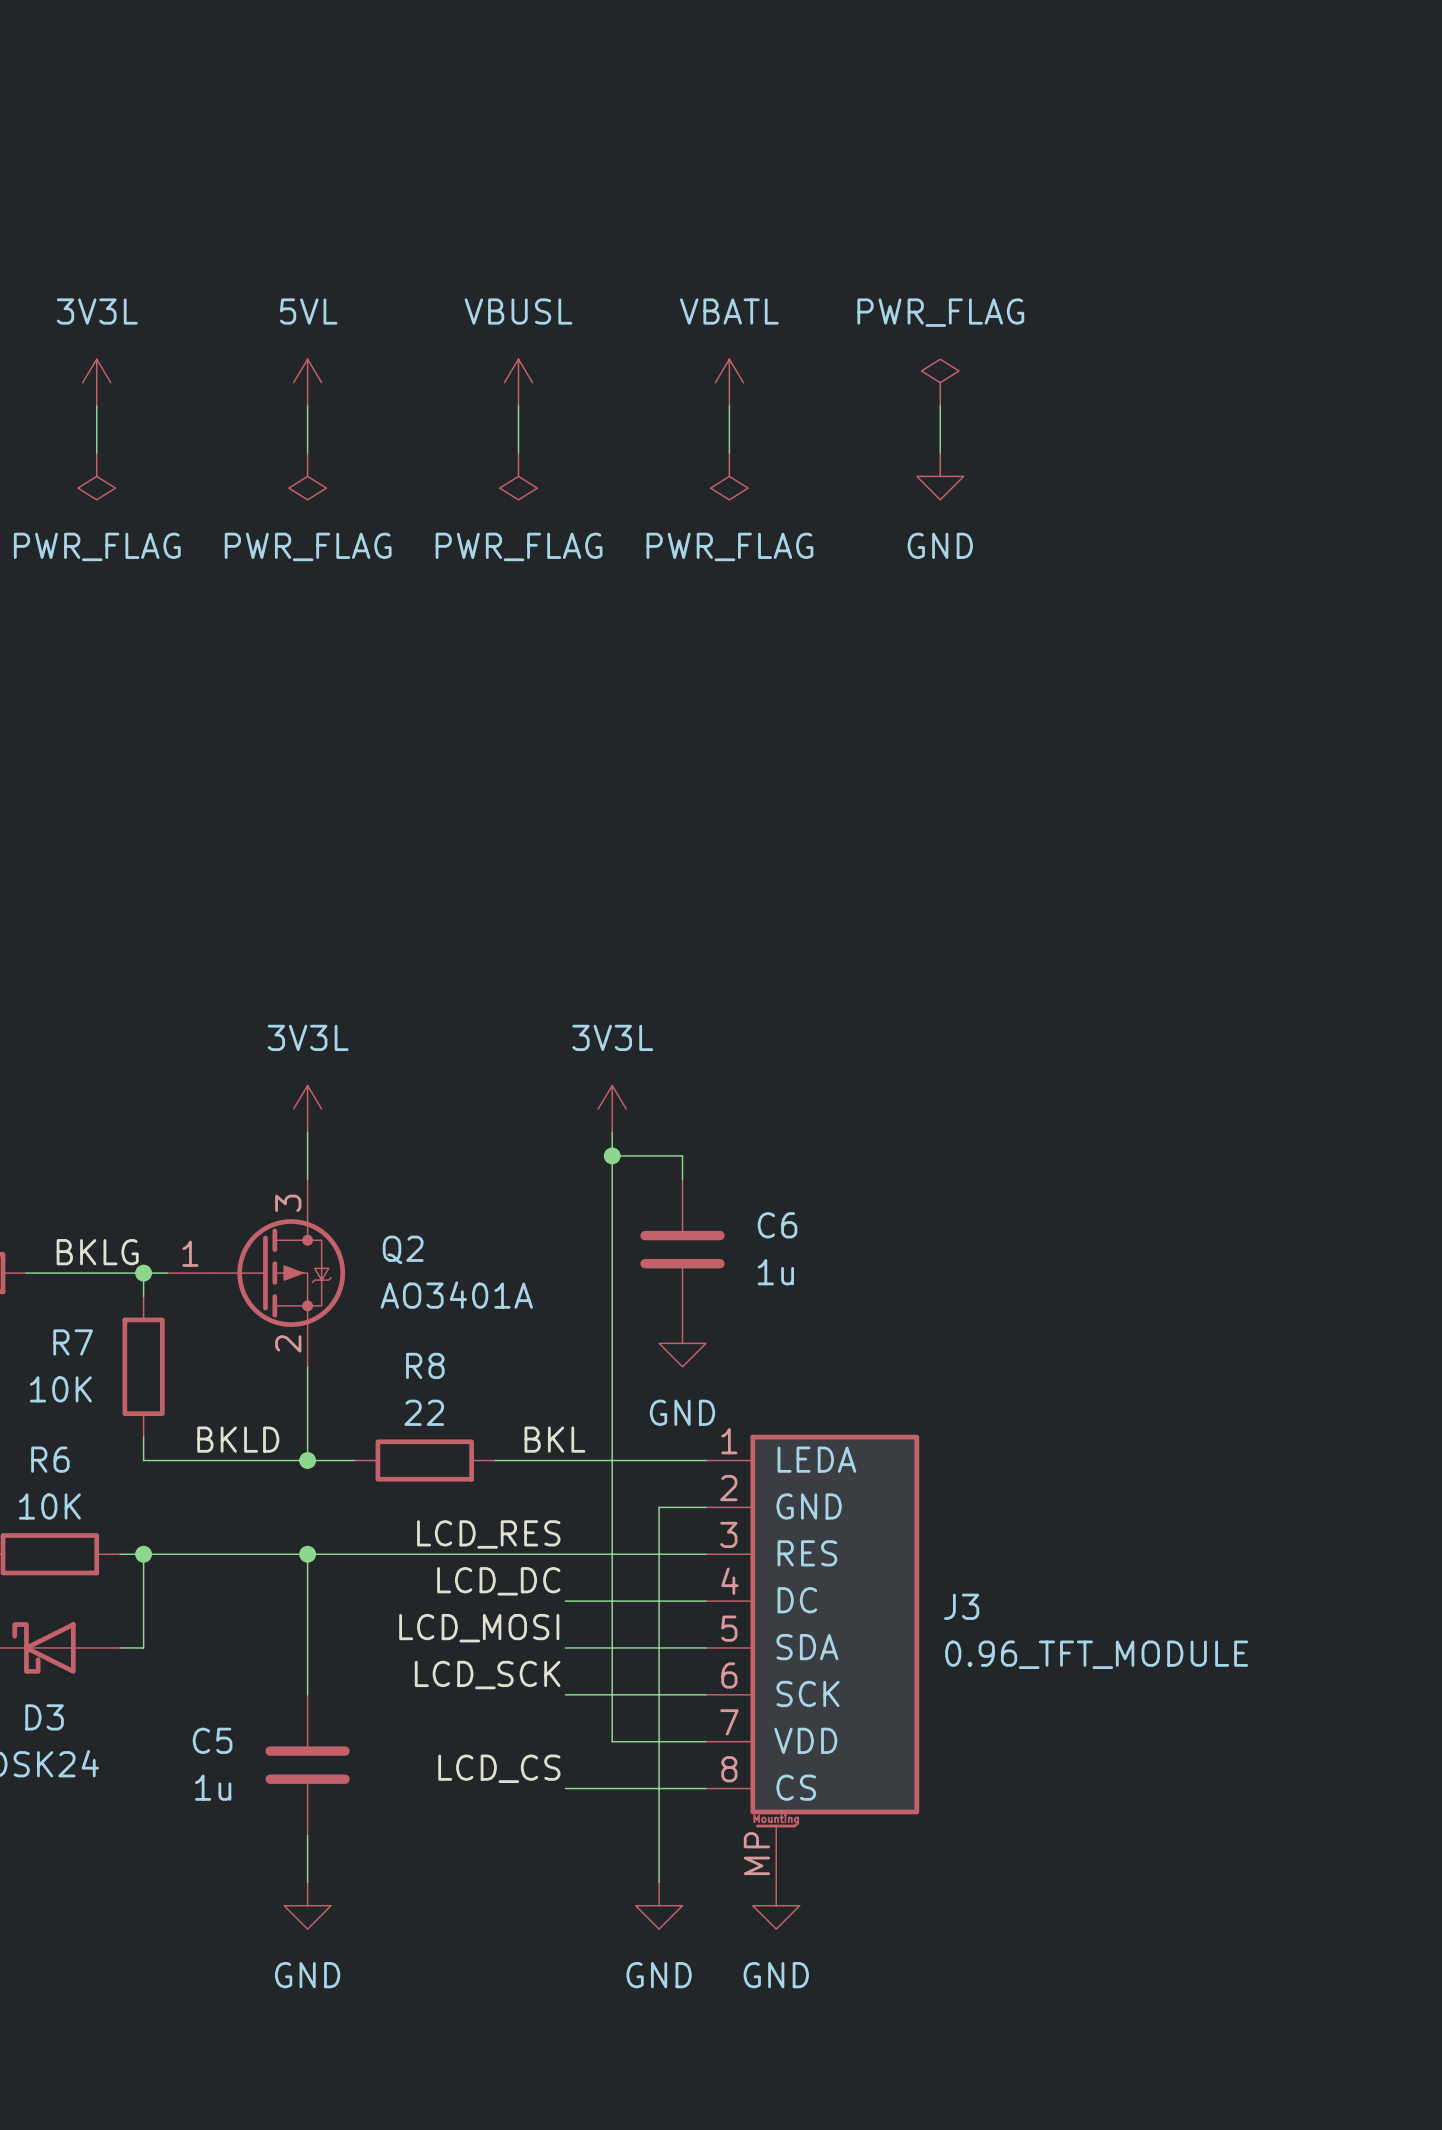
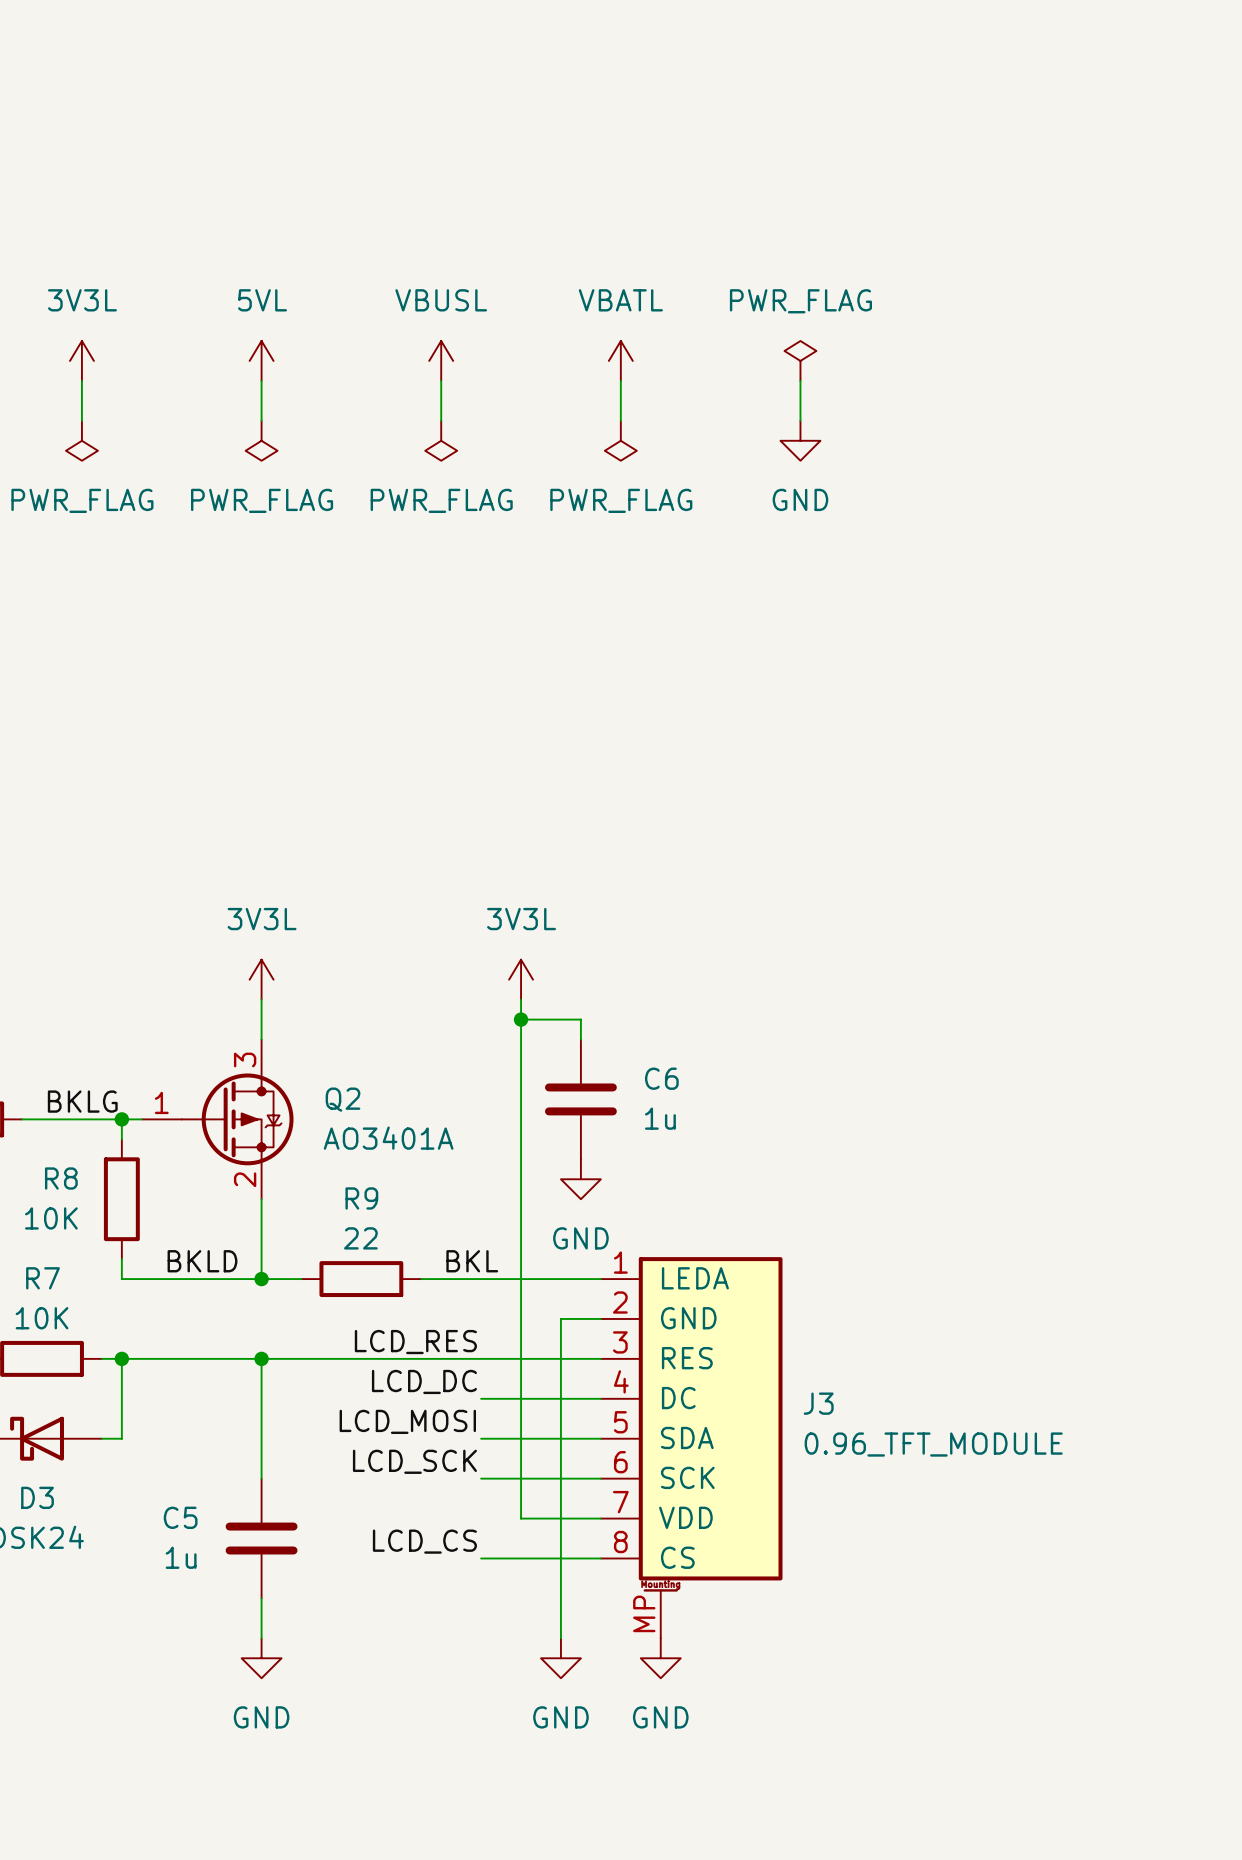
R7 name: R7 (73, 1342) -> R8 (61, 1178)
R8 name: R8 (425, 1365) -> R9 (361, 1198)
R6 name: R6 (50, 1459) -> R7 (42, 1278)

